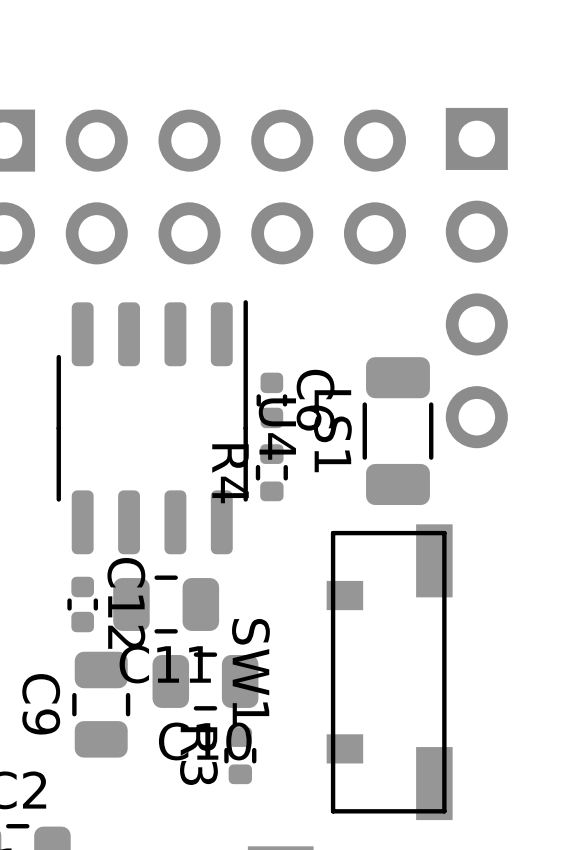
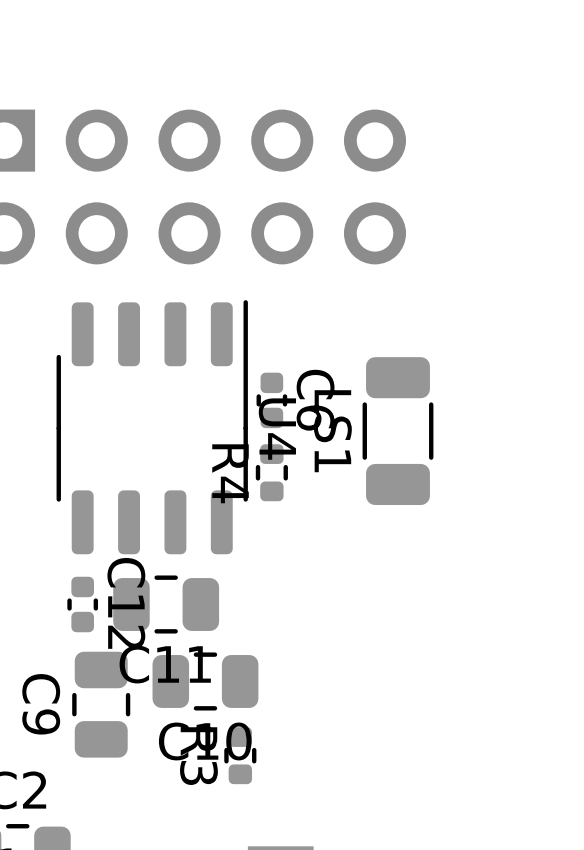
part: (476, 278) -> none
SW1: (389, 672) -> none

